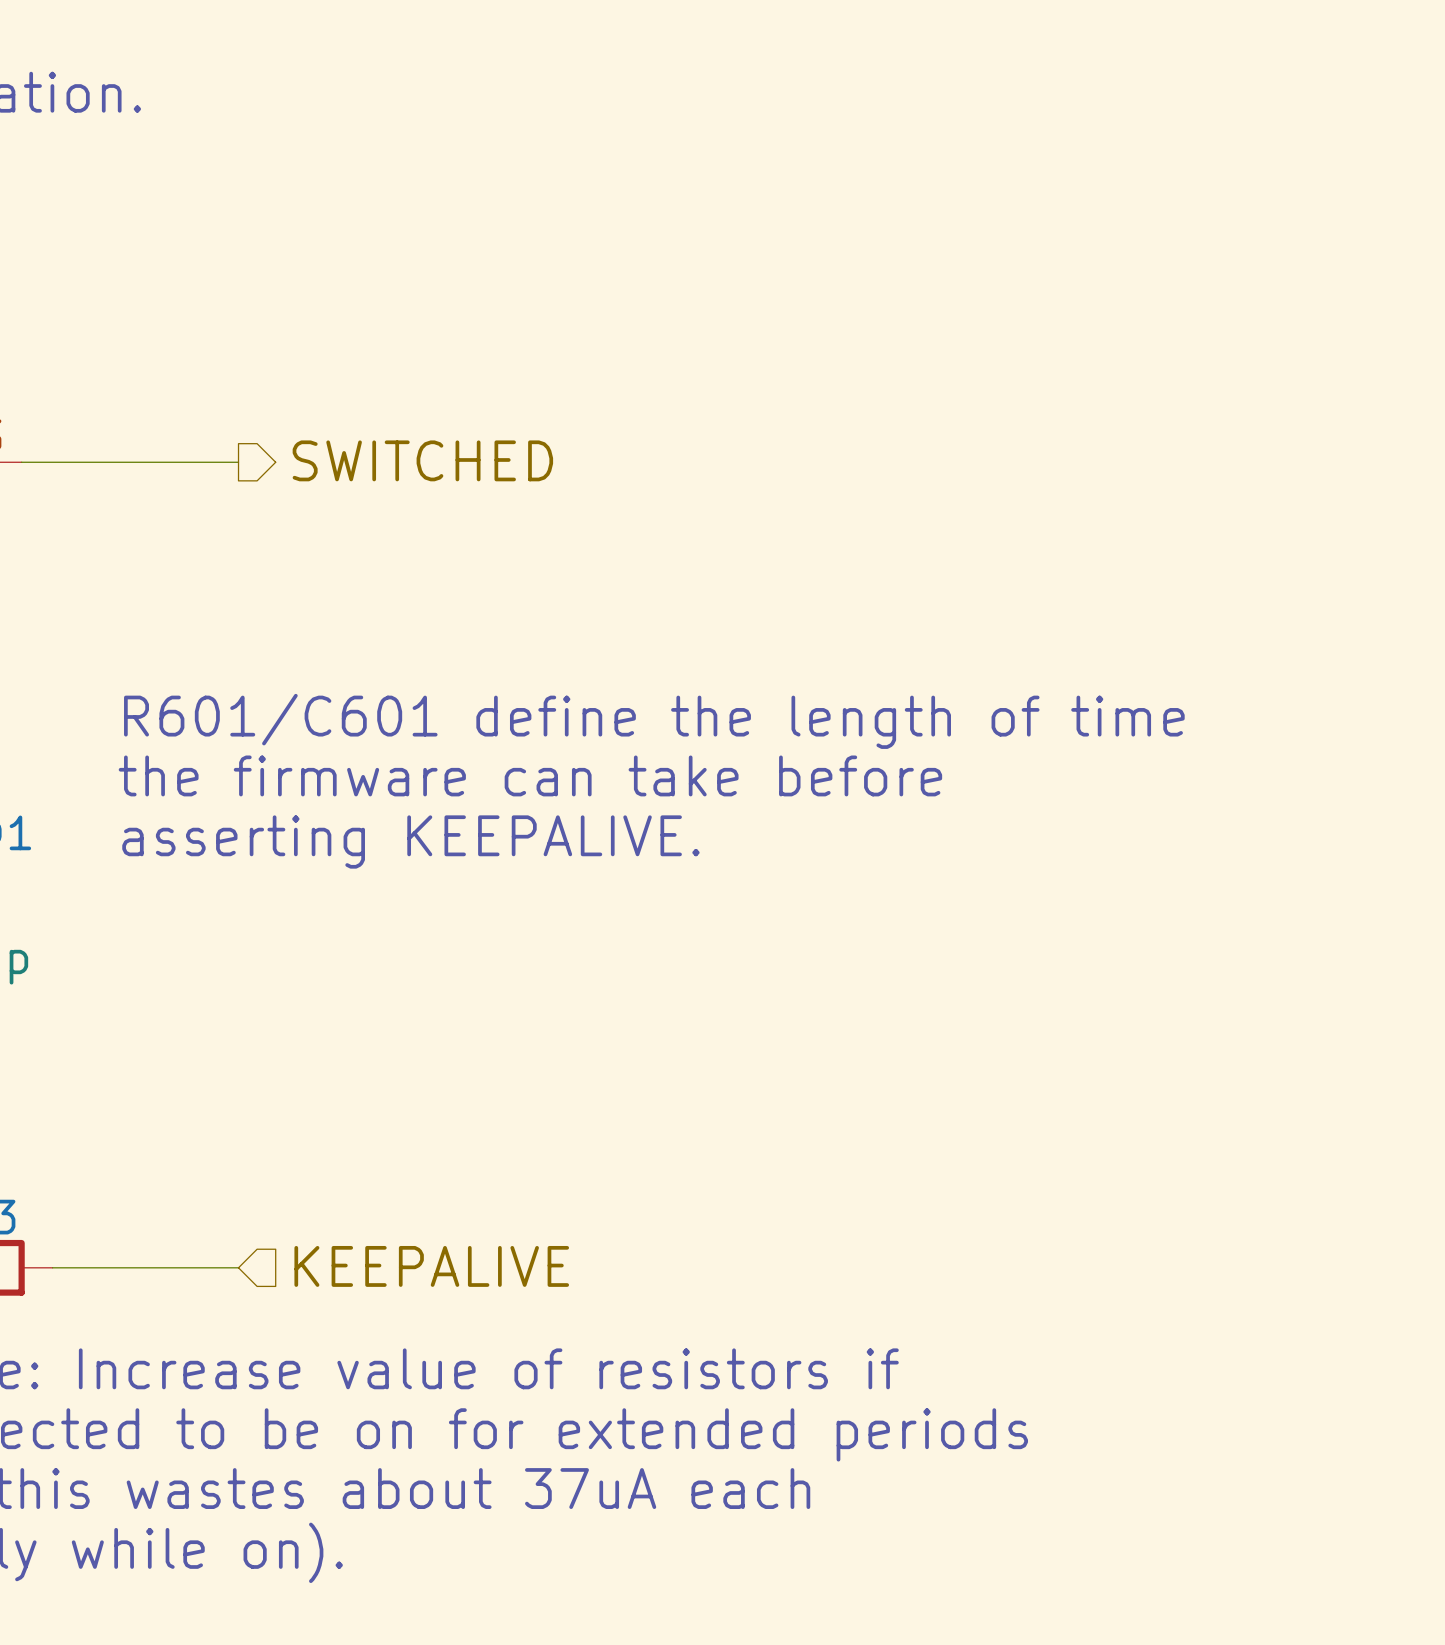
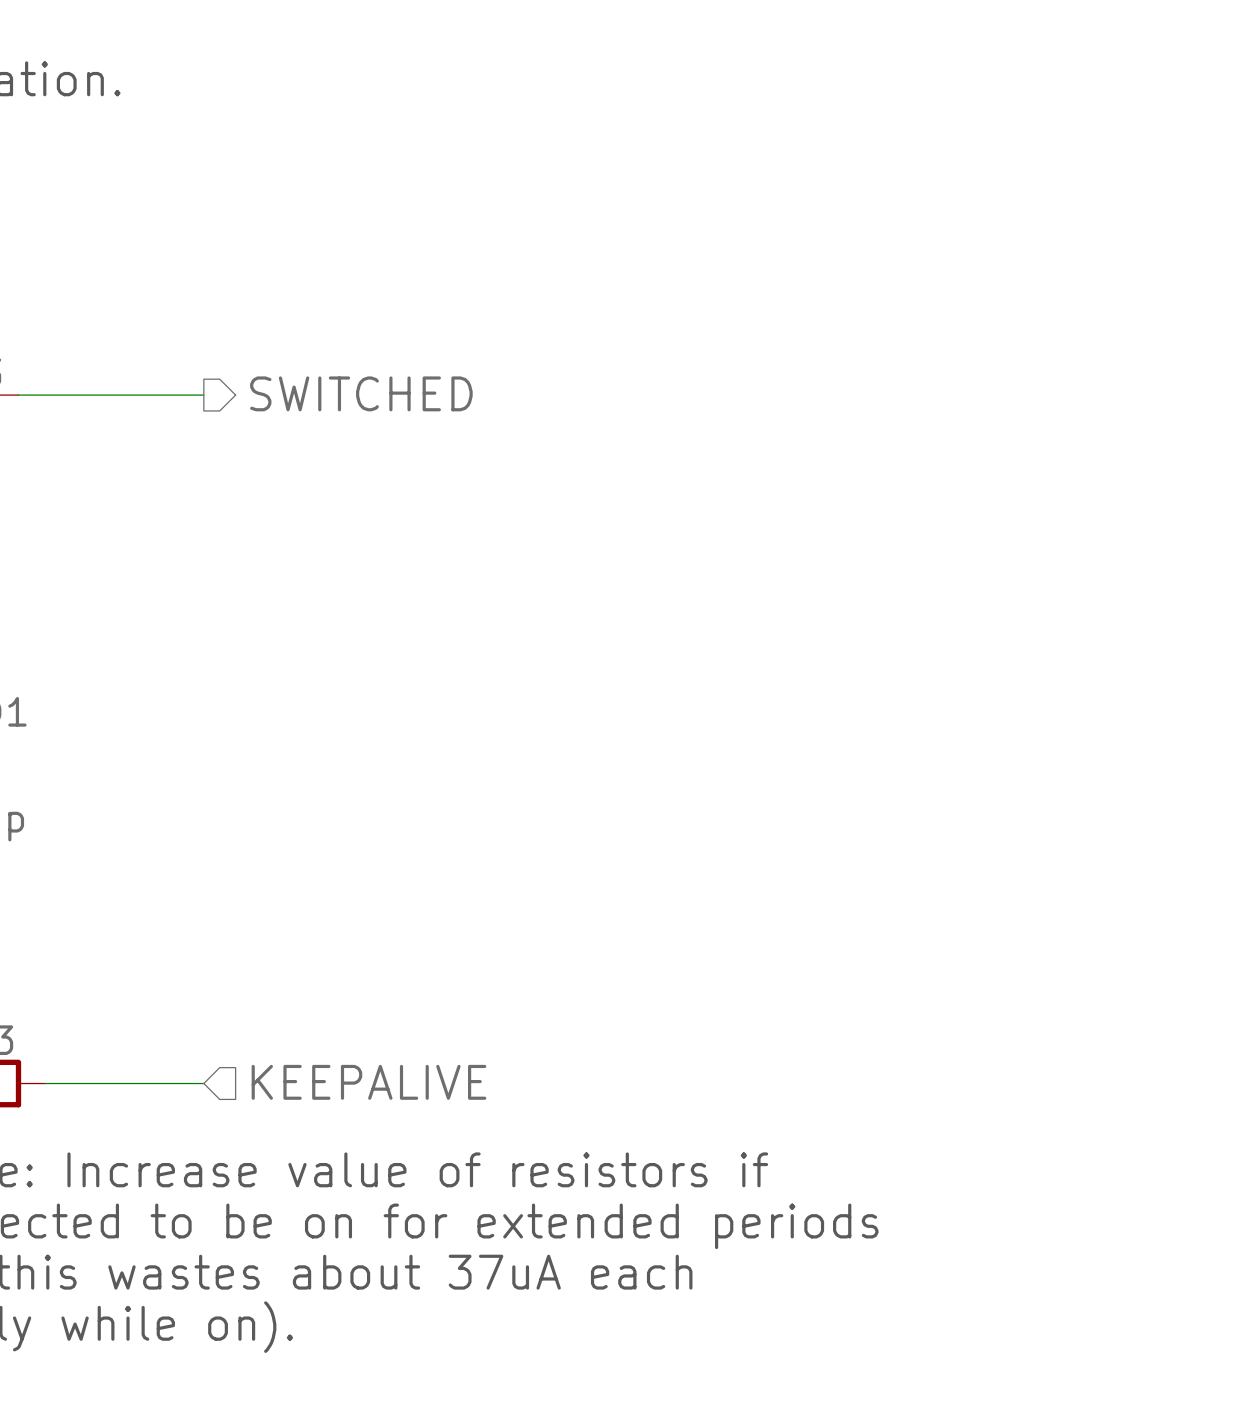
text: R601/C601 define the length of time (654, 721) -> none
text: the firmware can take before (530, 775) -> none
text: asserting KEEPALIVE. (410, 842) -> none

